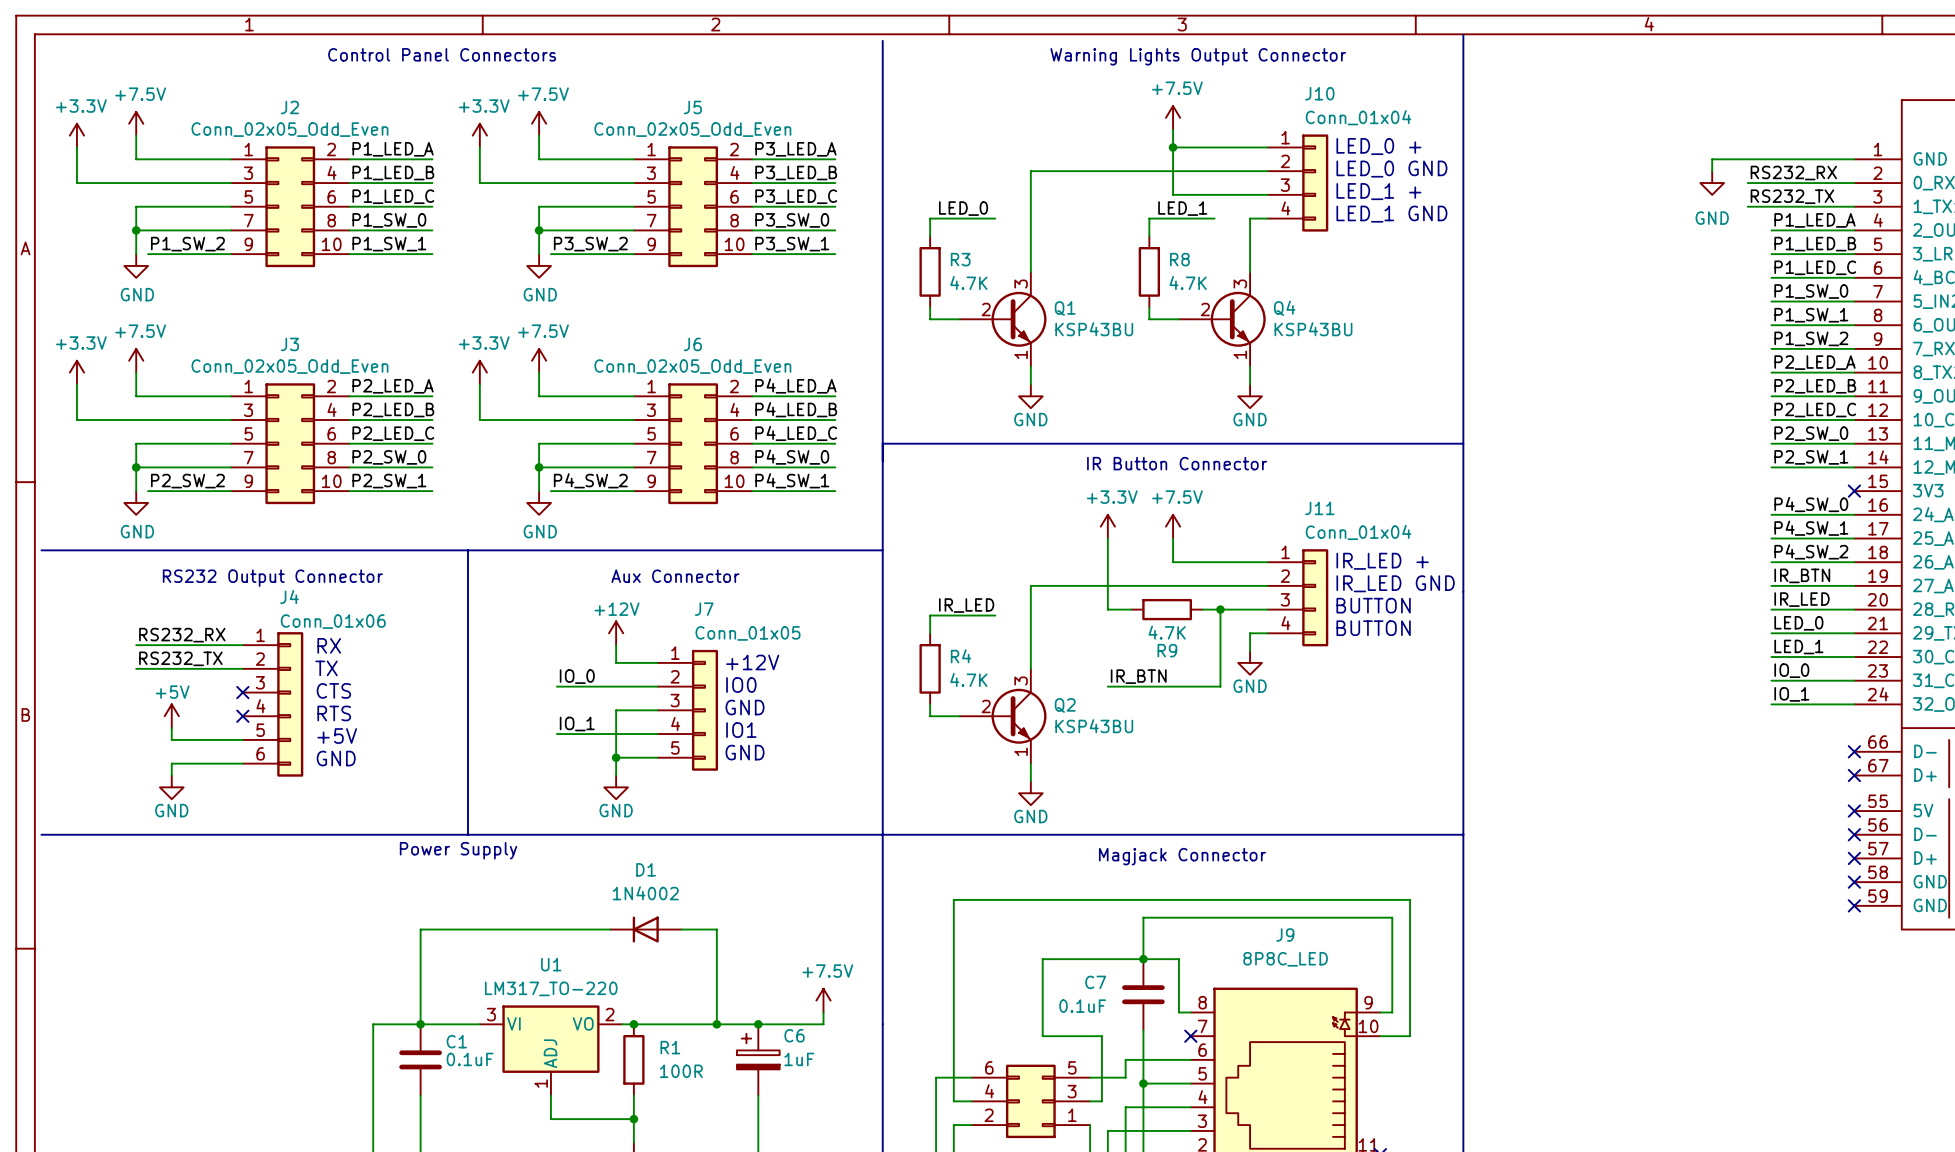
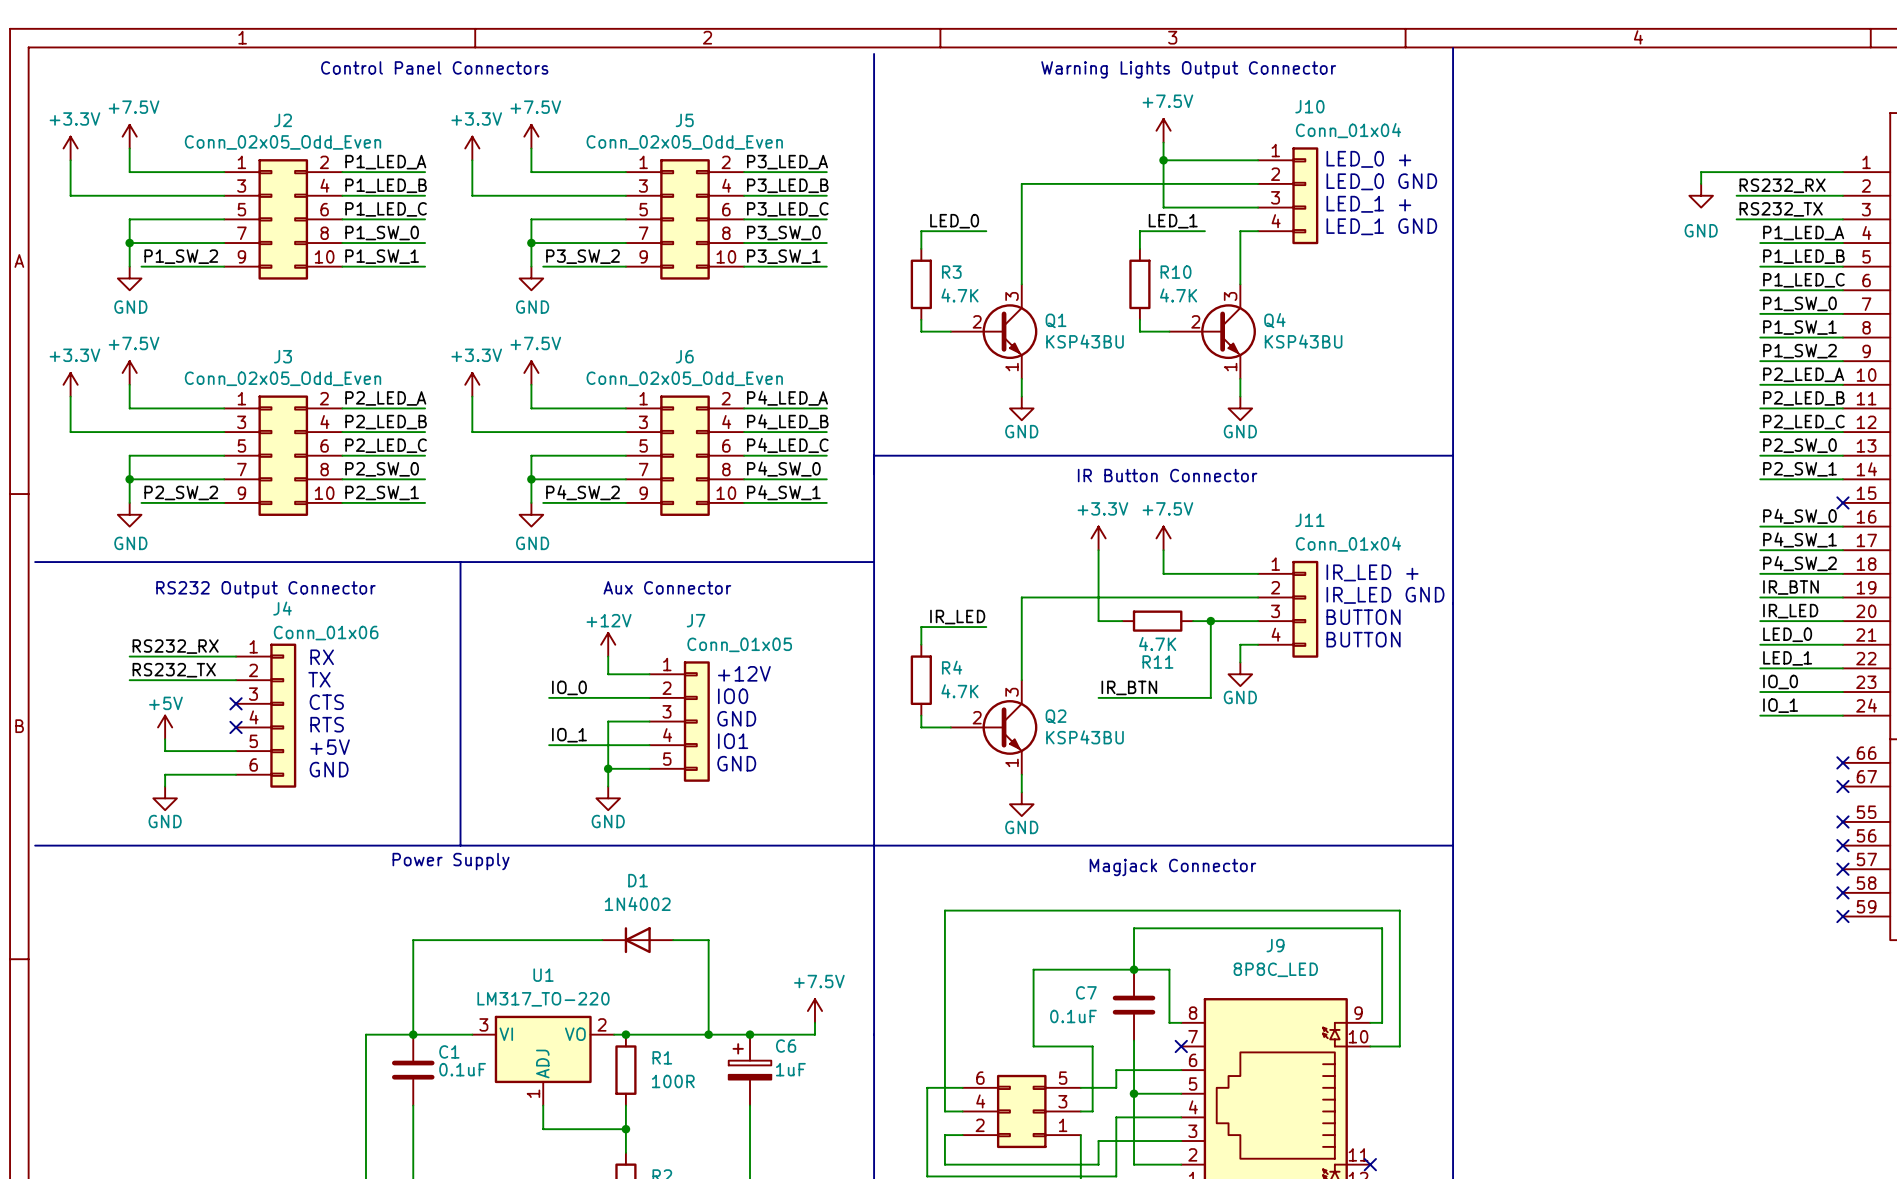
R8 name: R8 (1179, 259) -> R10 (1176, 272)
R9 name: R9 (1167, 650) -> R11 (1157, 662)

